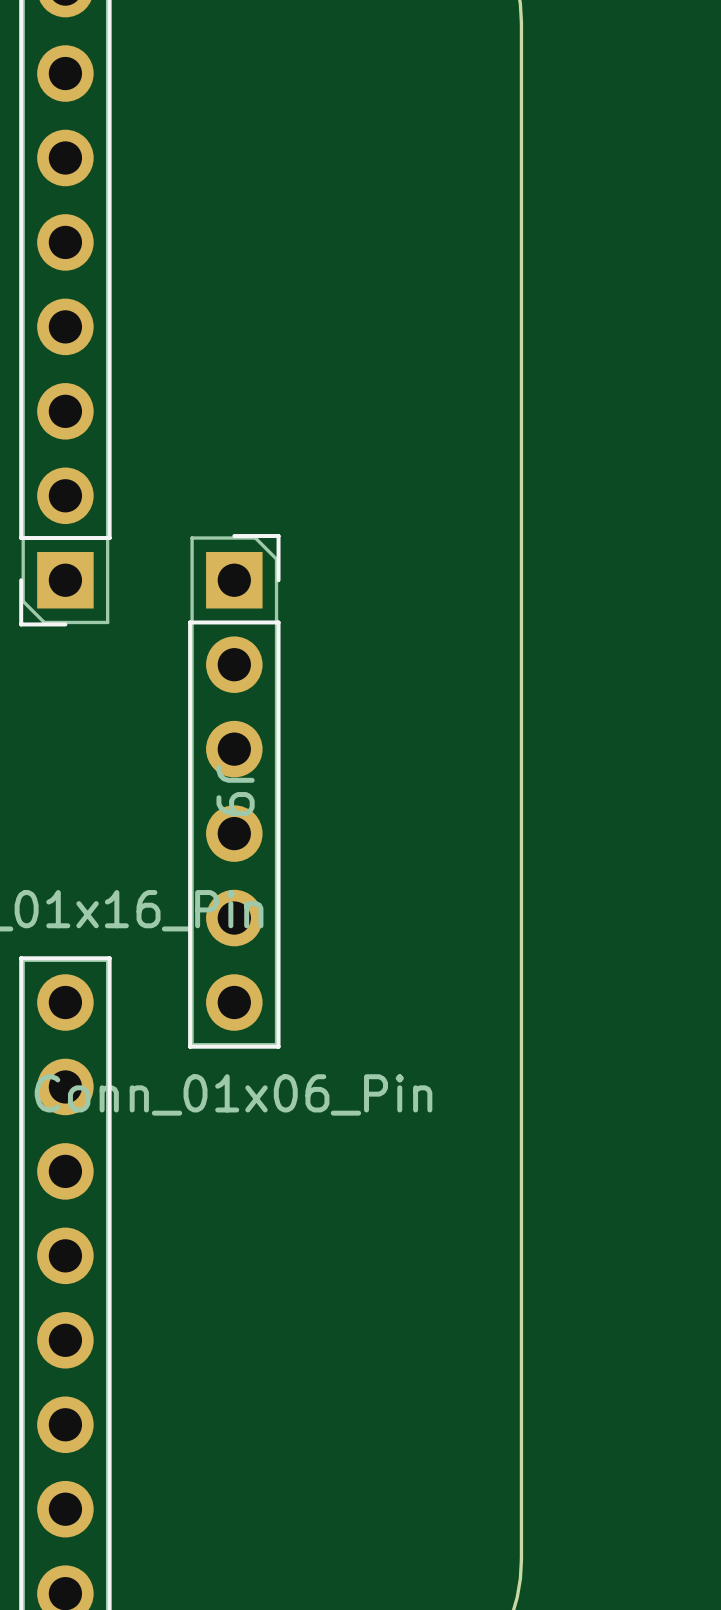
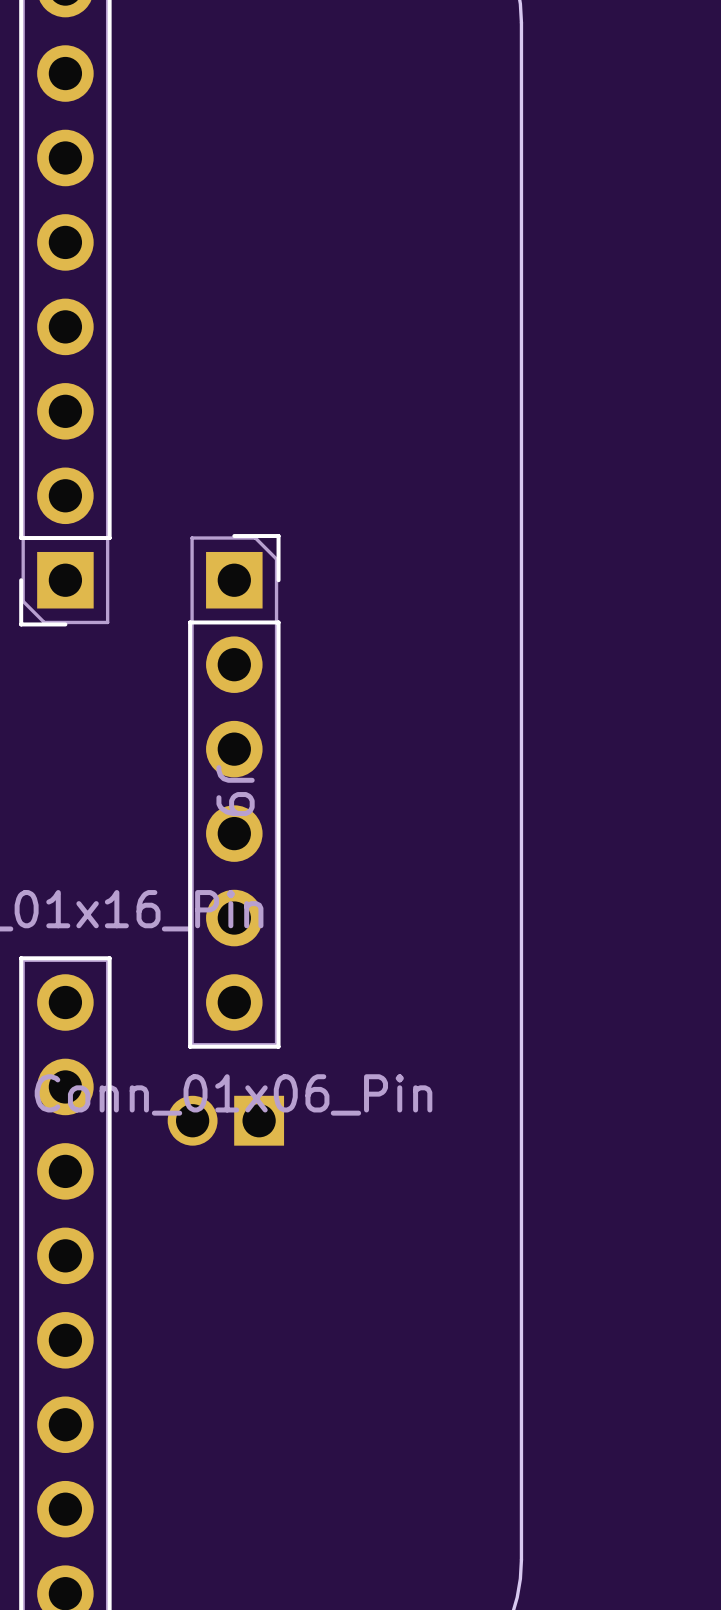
part: none -> (225, 1120)

